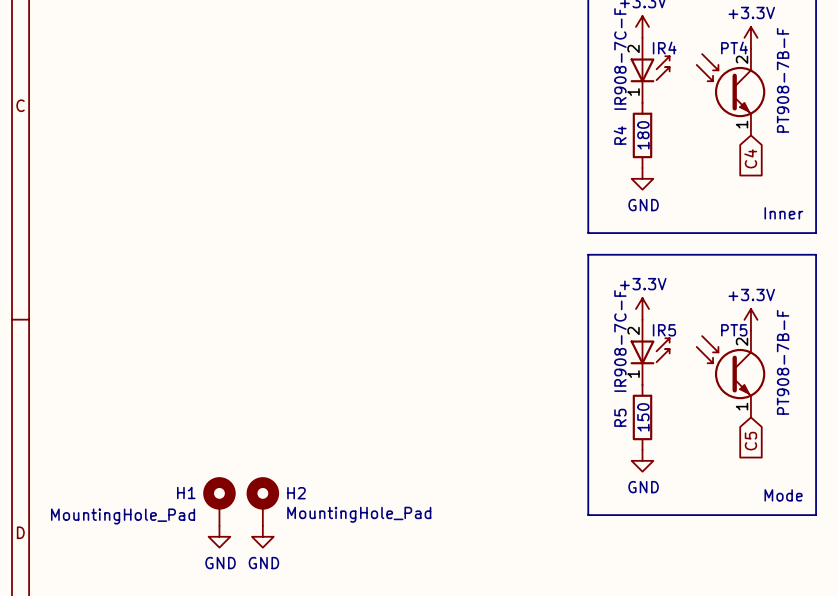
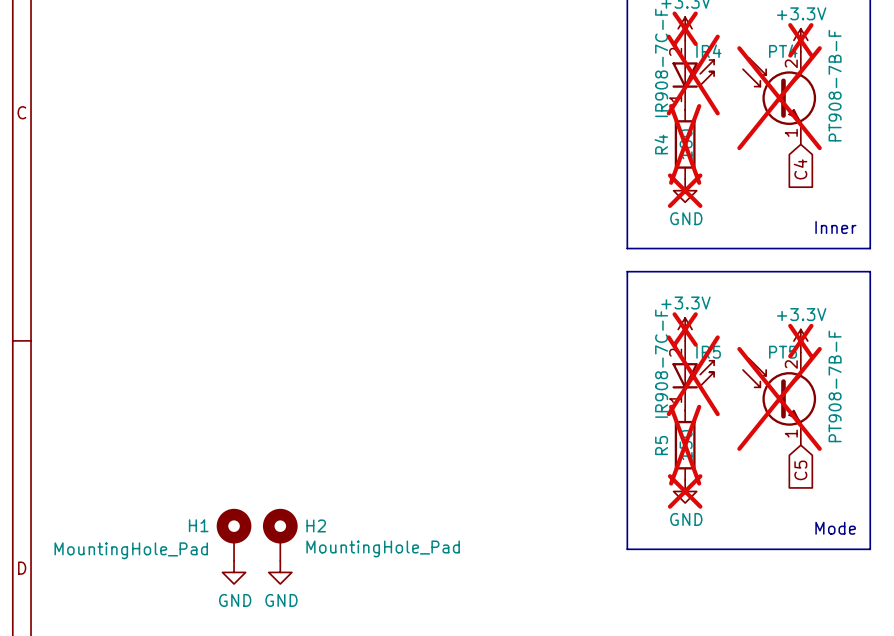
power symbol do-not-place cross: none -> (685, 28)
power symbol do-not-place cross: none -> (800, 40)
IR4 do-not-place cross: none -> (693, 75)
PT4 do-not-place cross: none -> (779, 98)
R4 do-not-place cross: none -> (685, 144)
power symbol do-not-place cross: none -> (685, 190)
power symbol do-not-place cross: none -> (685, 329)
power symbol do-not-place cross: none -> (800, 341)
IR5 do-not-place cross: none -> (693, 375)
PT5 do-not-place cross: none -> (779, 398)
R5 do-not-place cross: none -> (685, 445)
power symbol do-not-place cross: none -> (685, 491)

